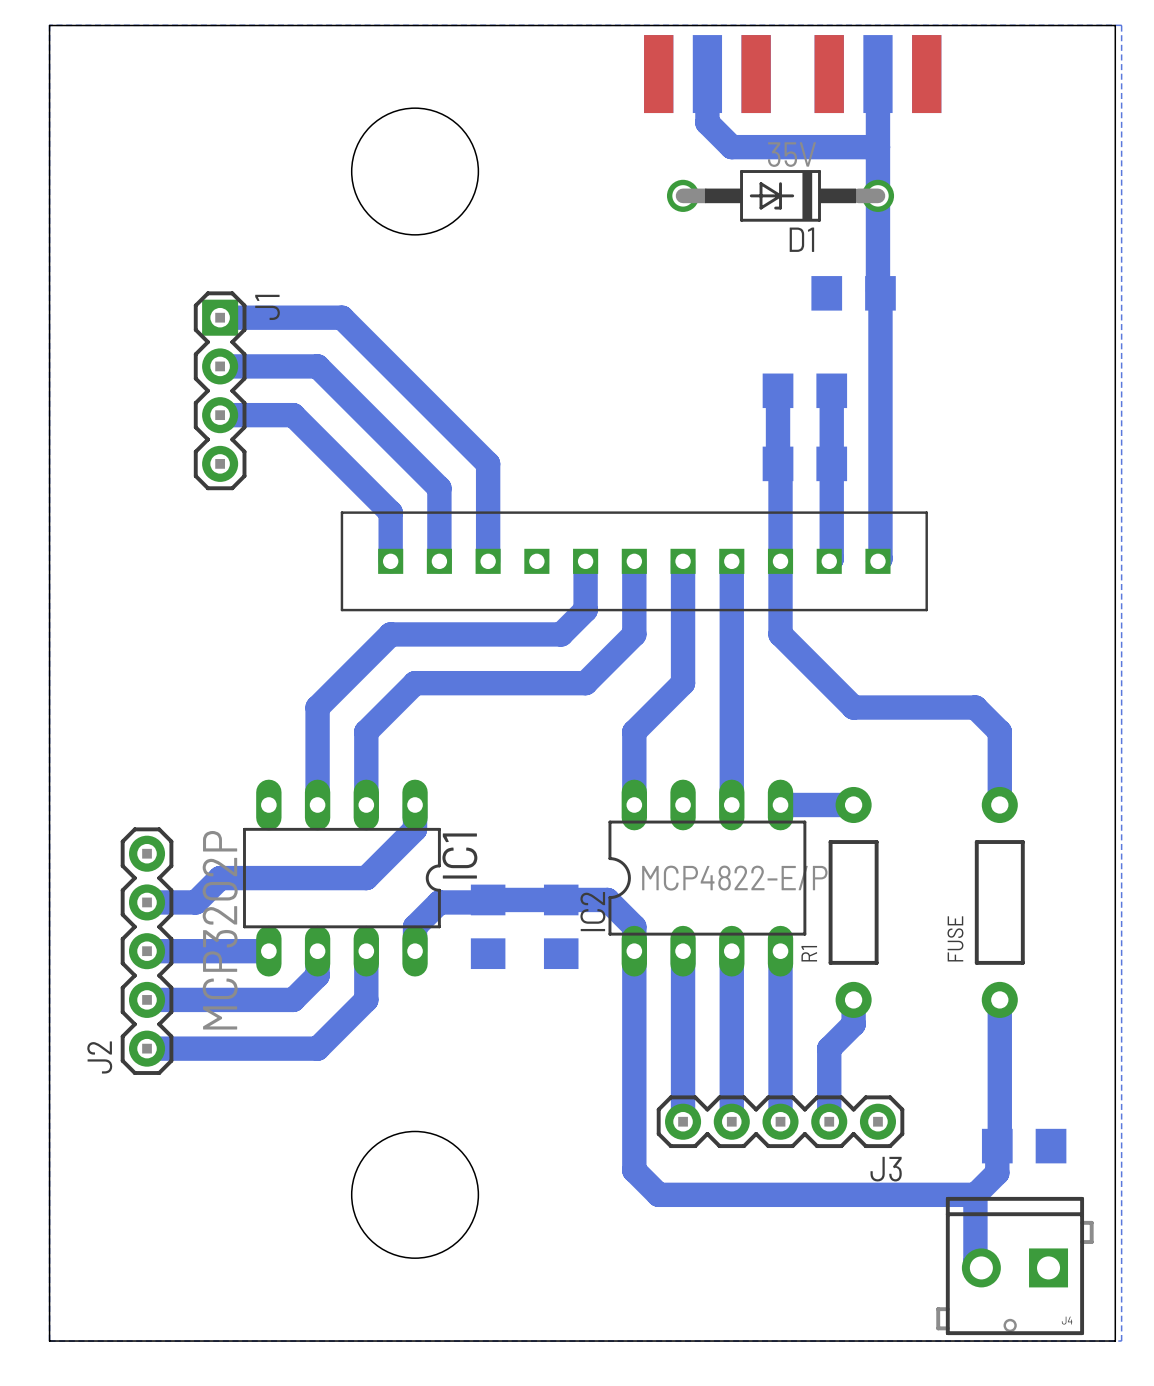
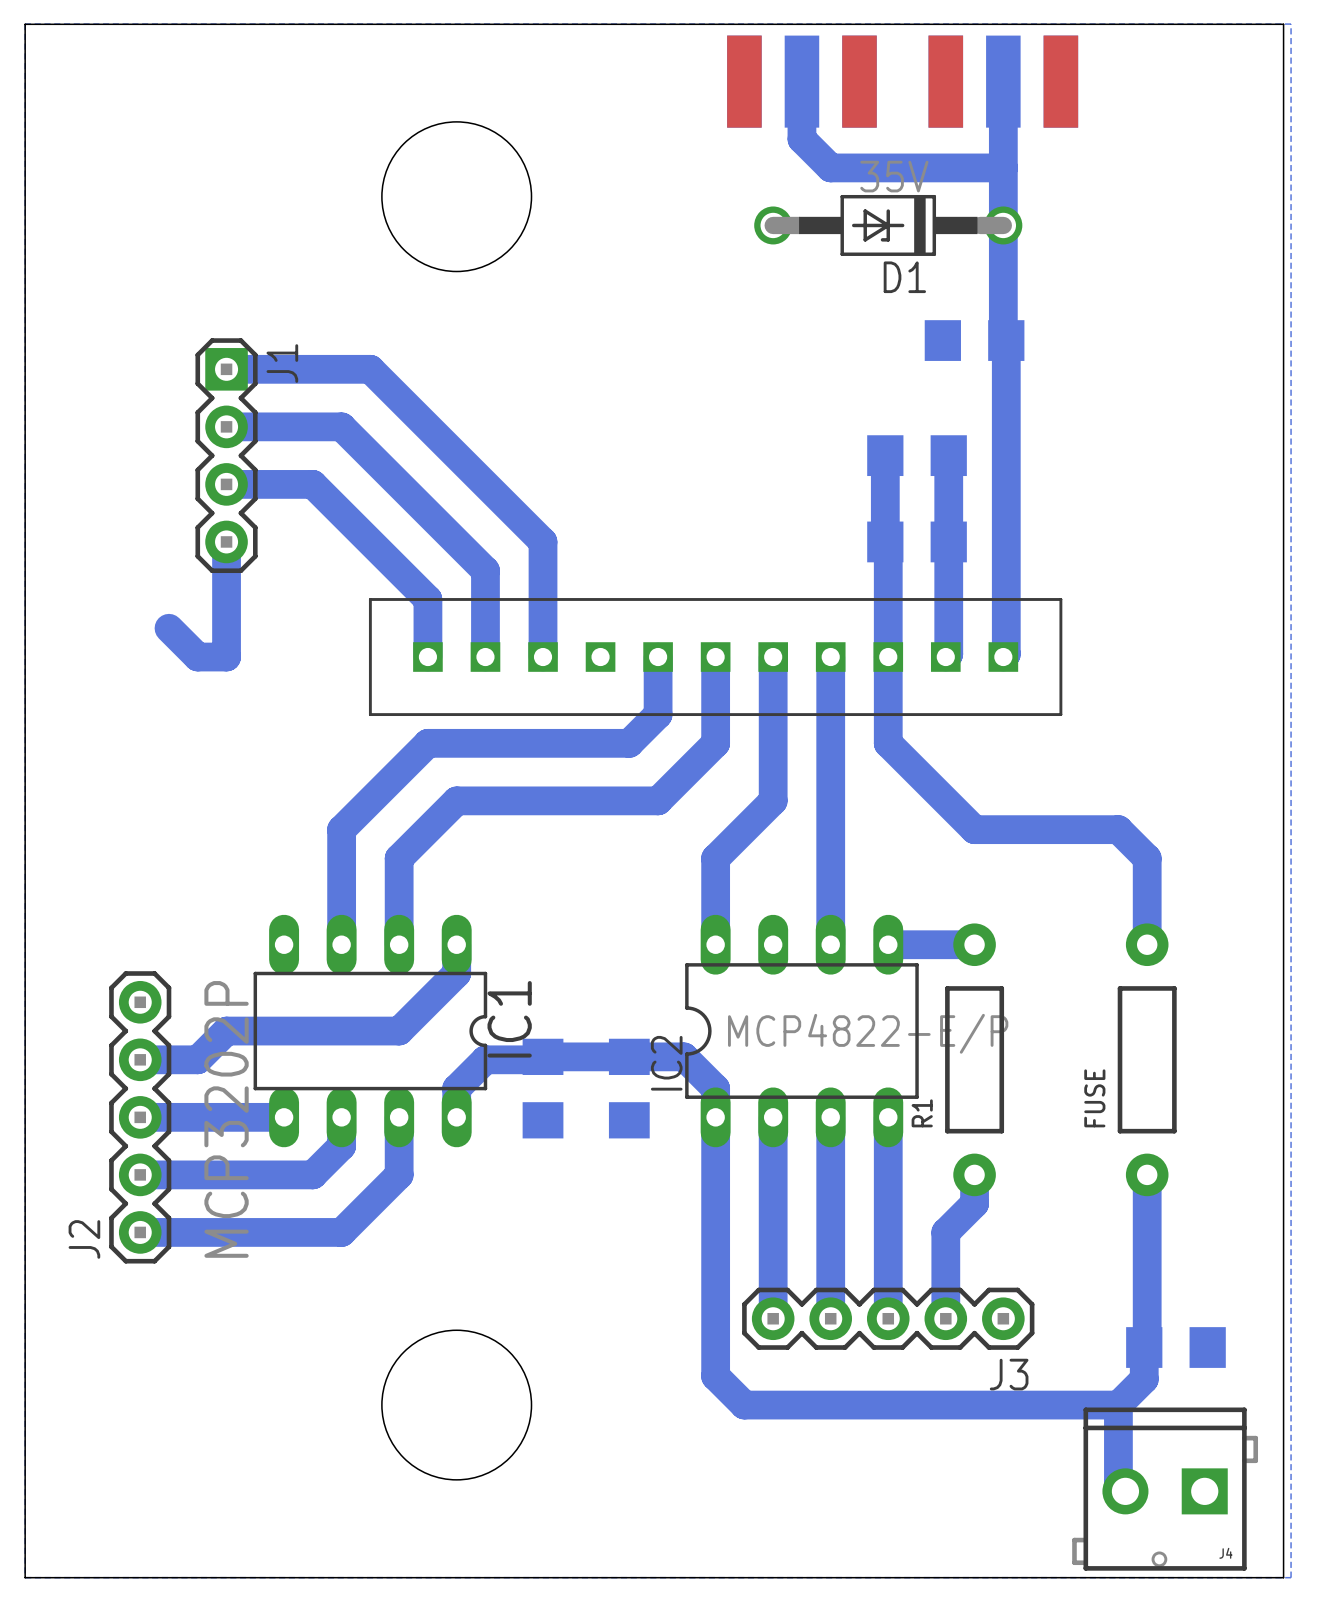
bottom track: none -> (226, 541) (226, 657) (197, 657) (169, 628)

